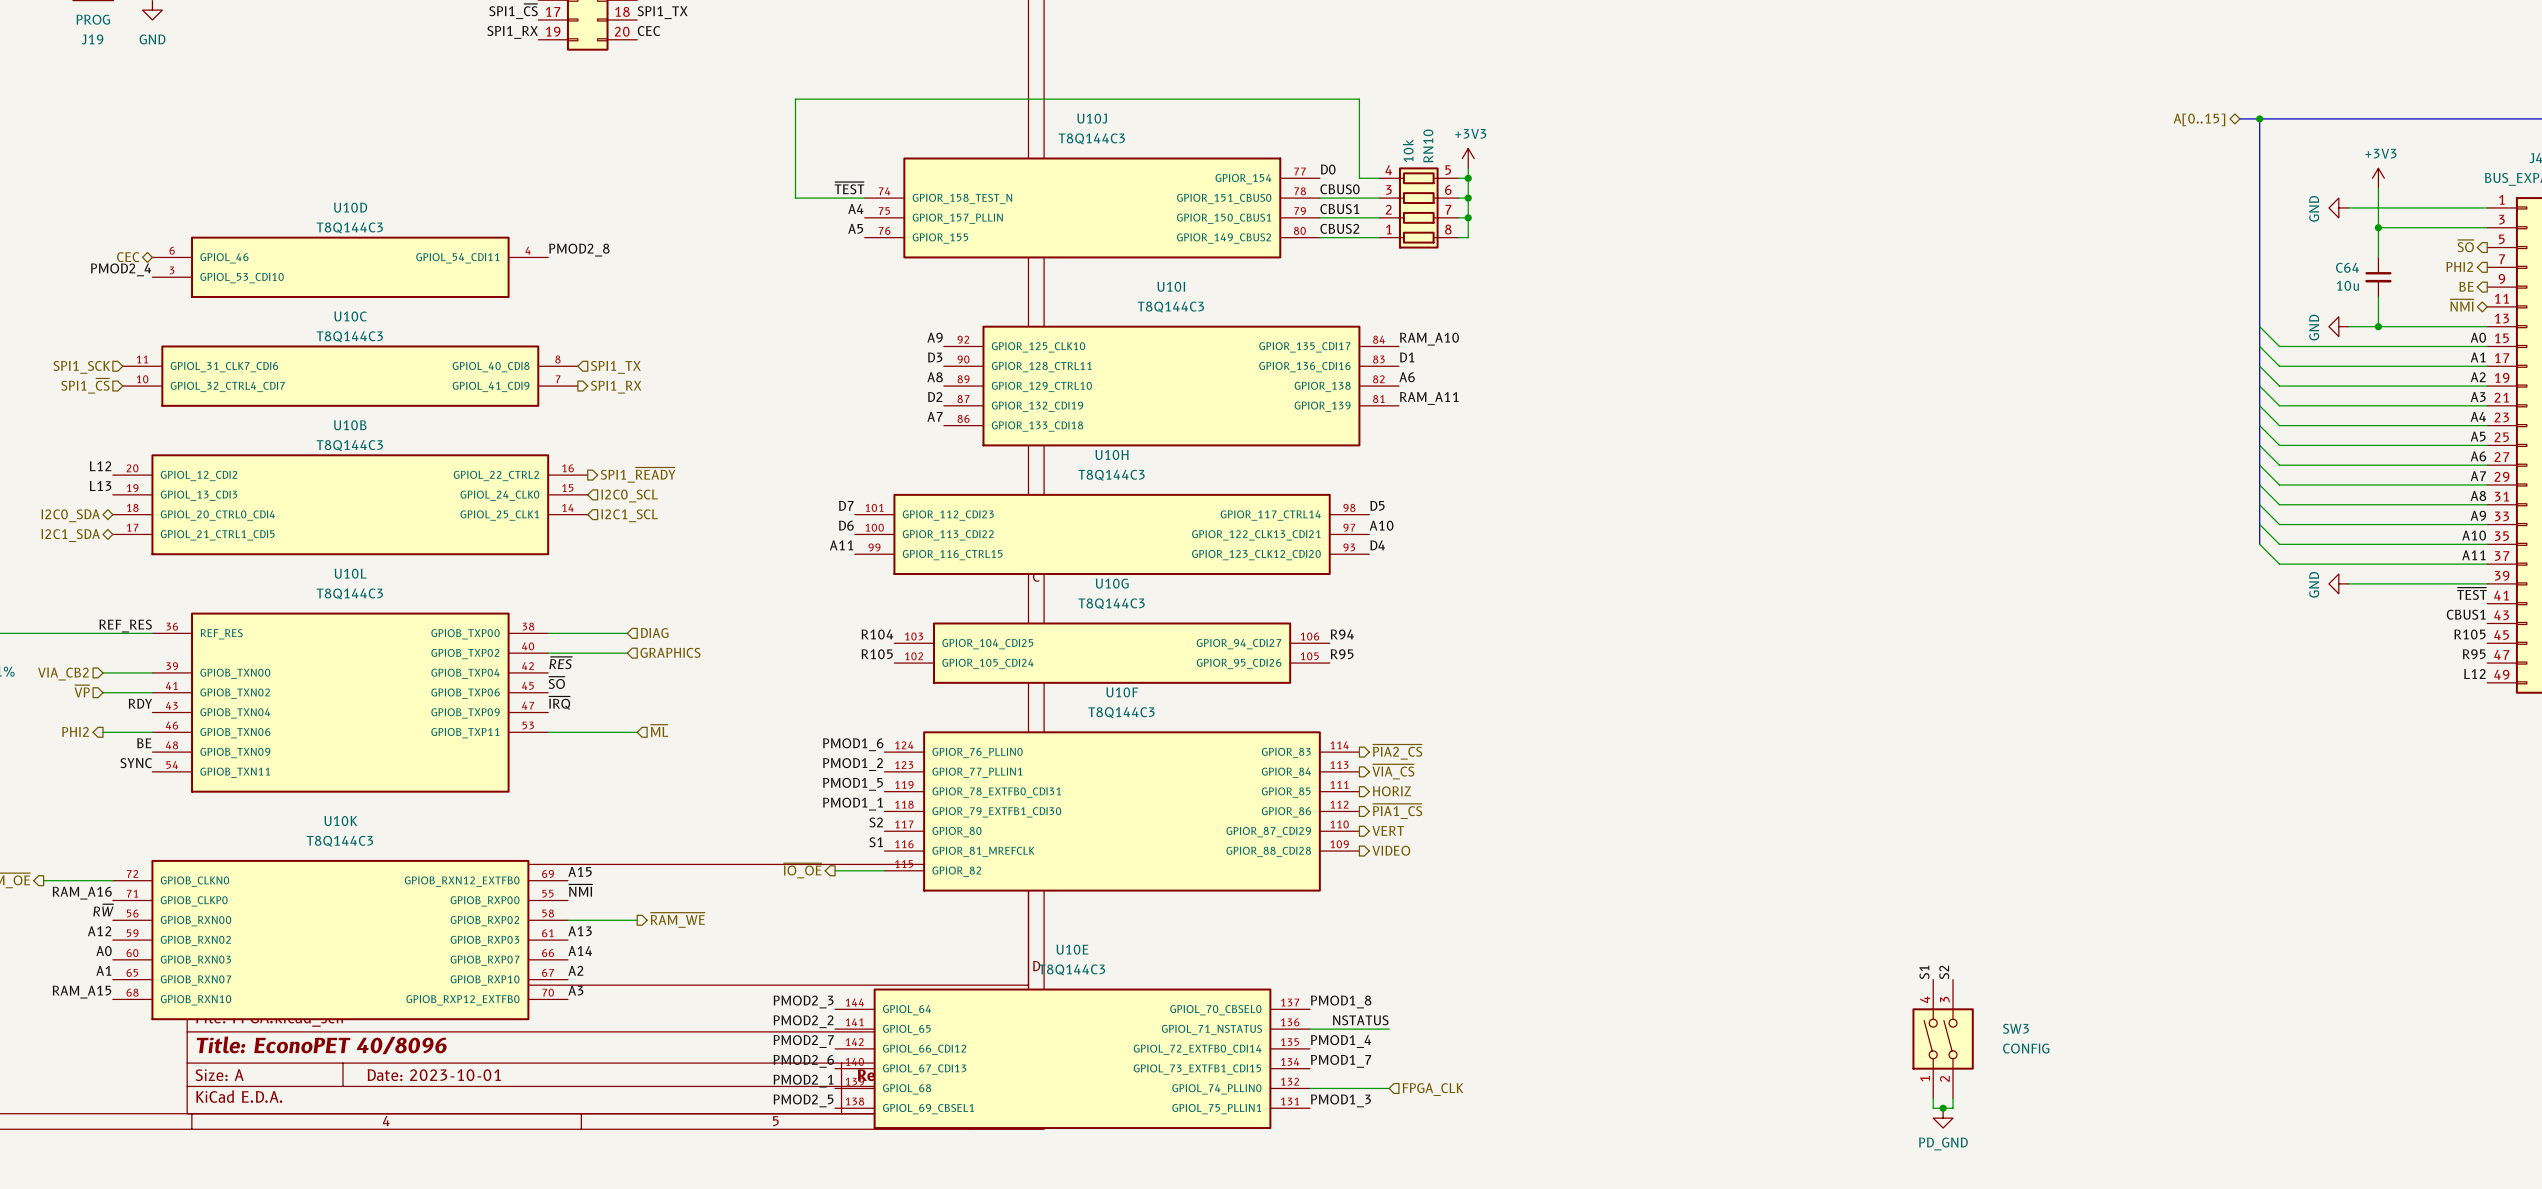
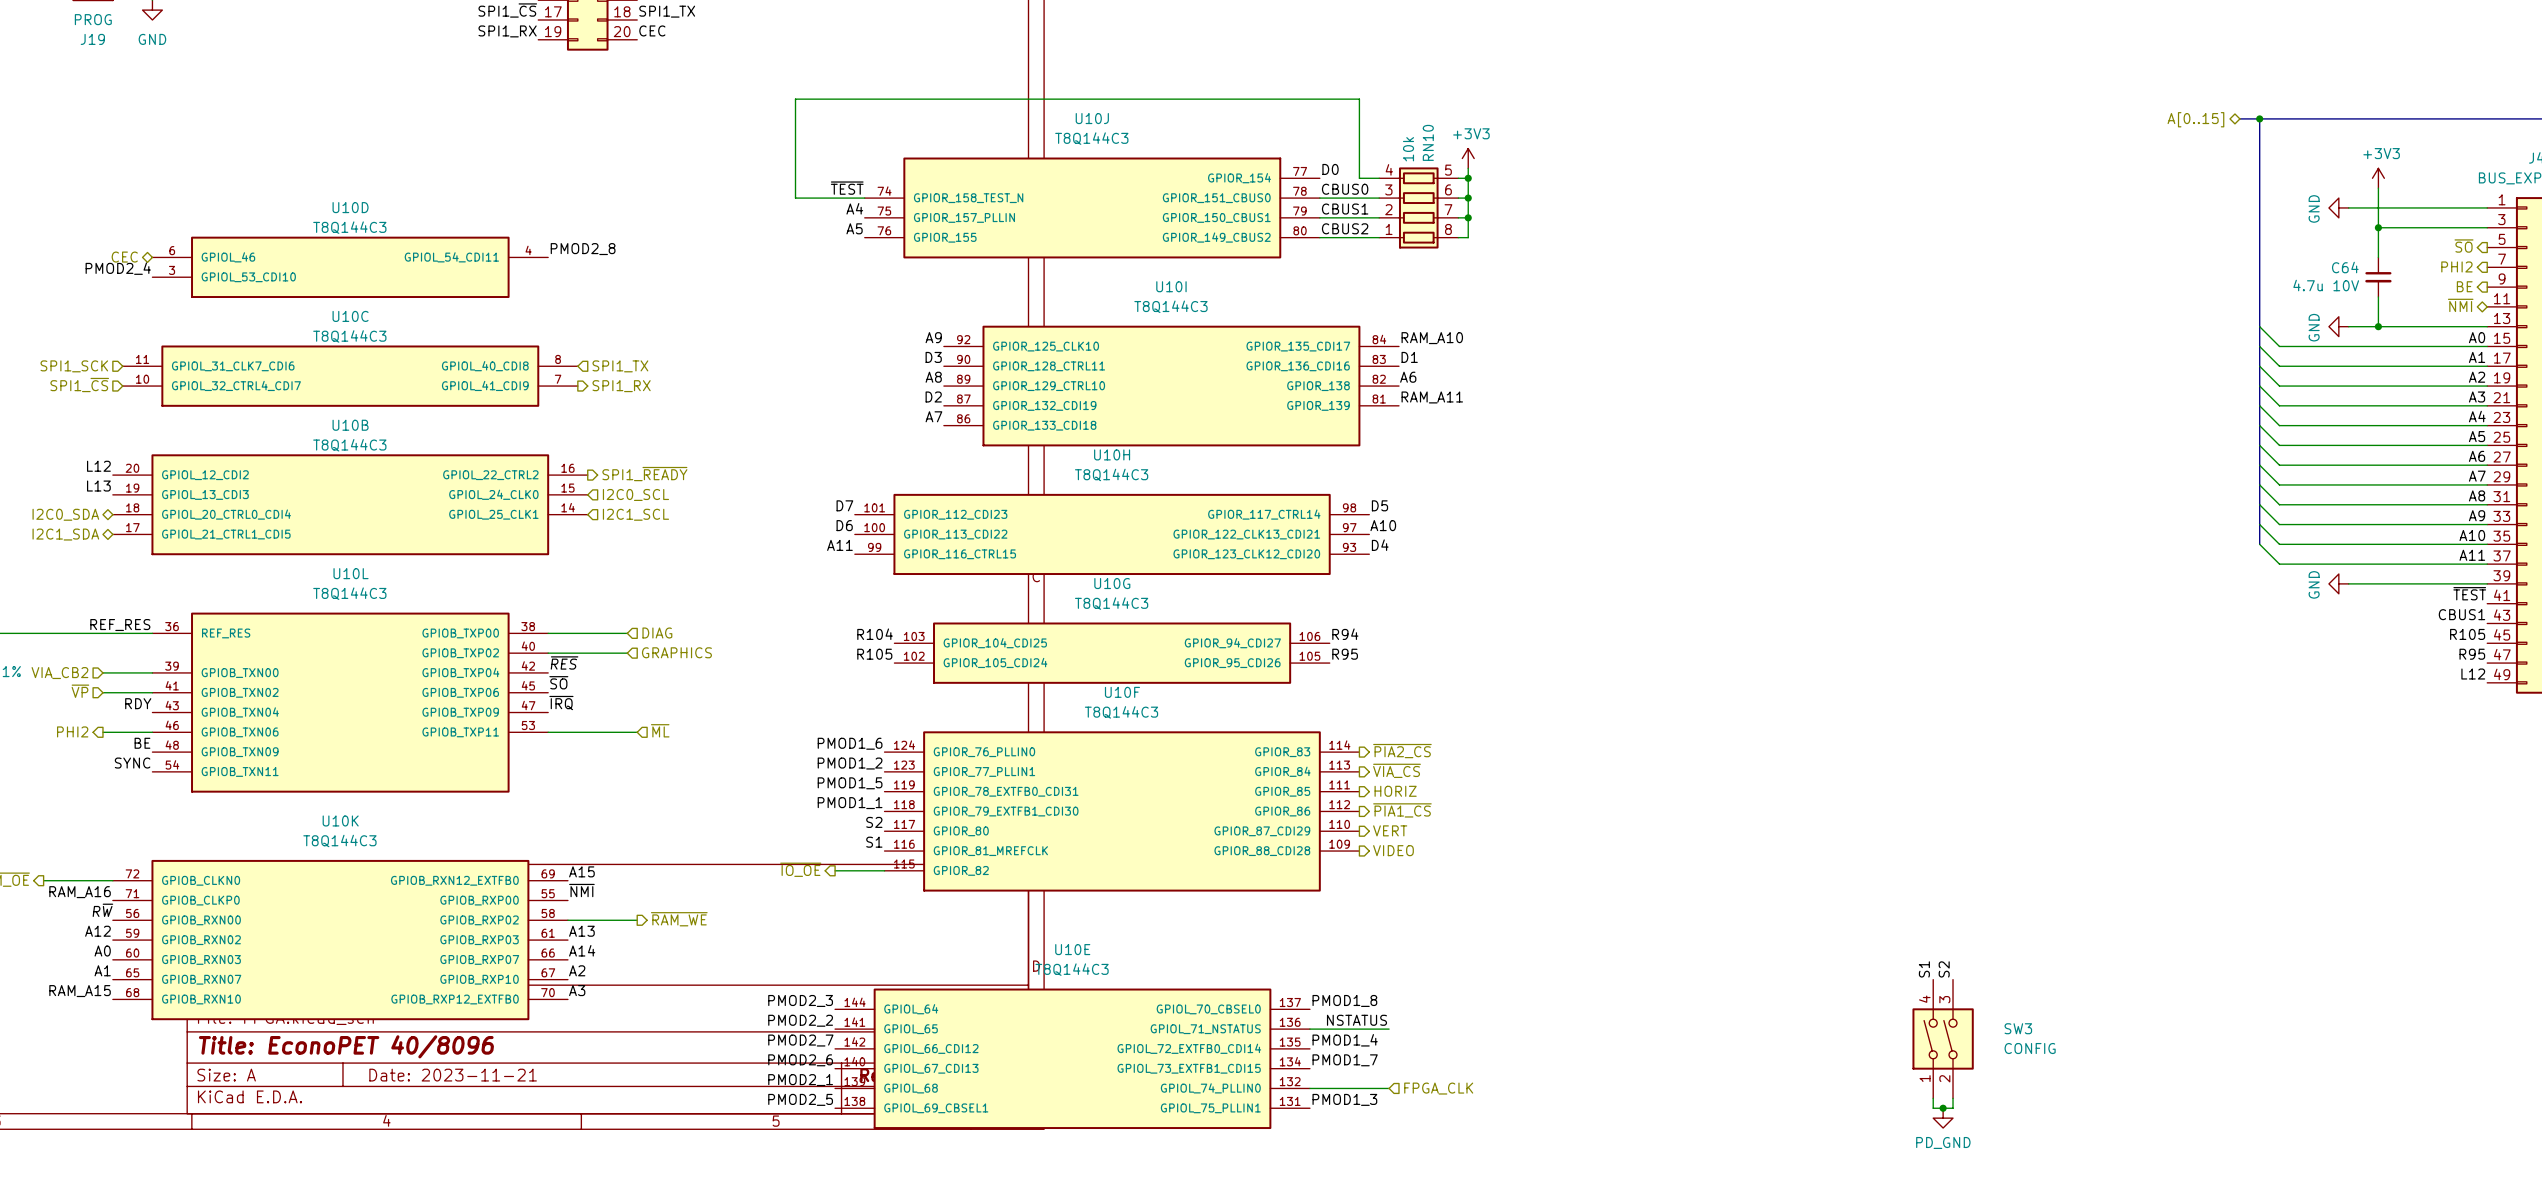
C64 value: 10u (2347, 285) -> 4.7u 10V (2326, 285)
title block: Date: 2023-10-01 (434, 1075) -> Date: 2023-11-21 (453, 1075)

